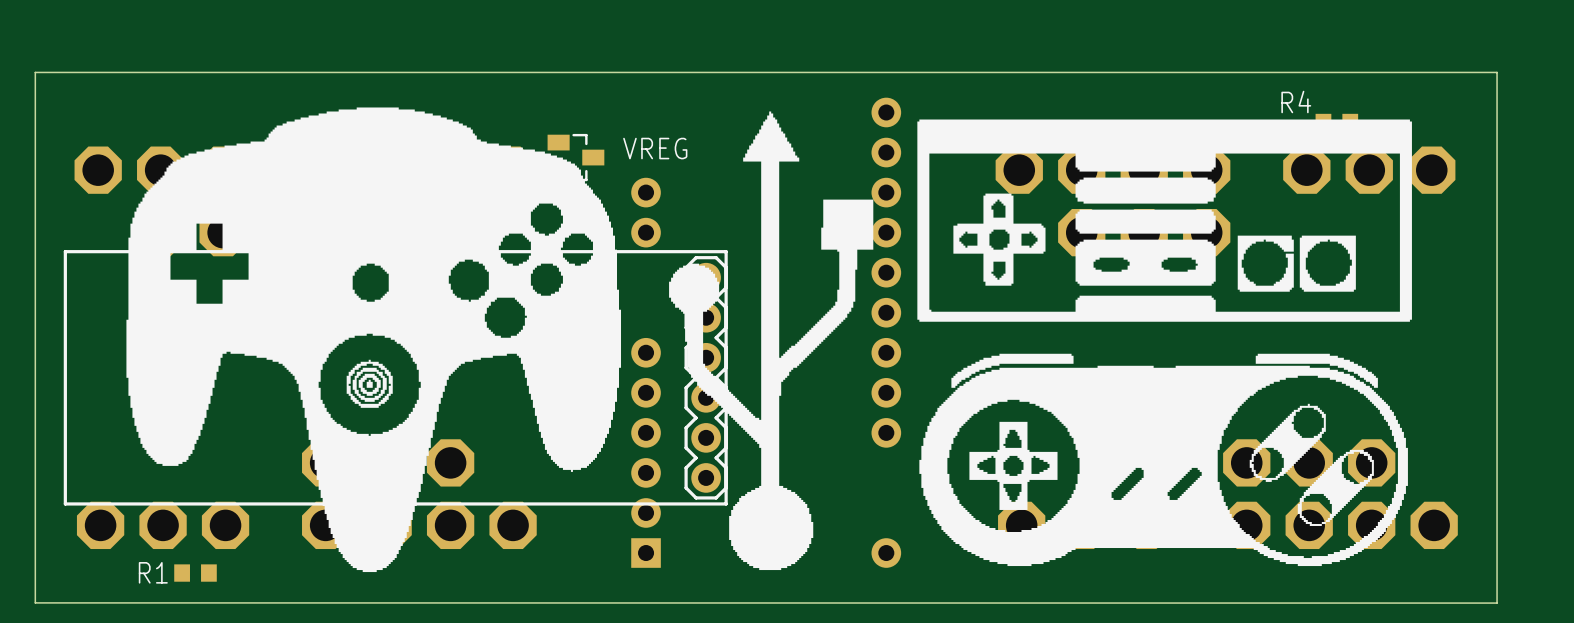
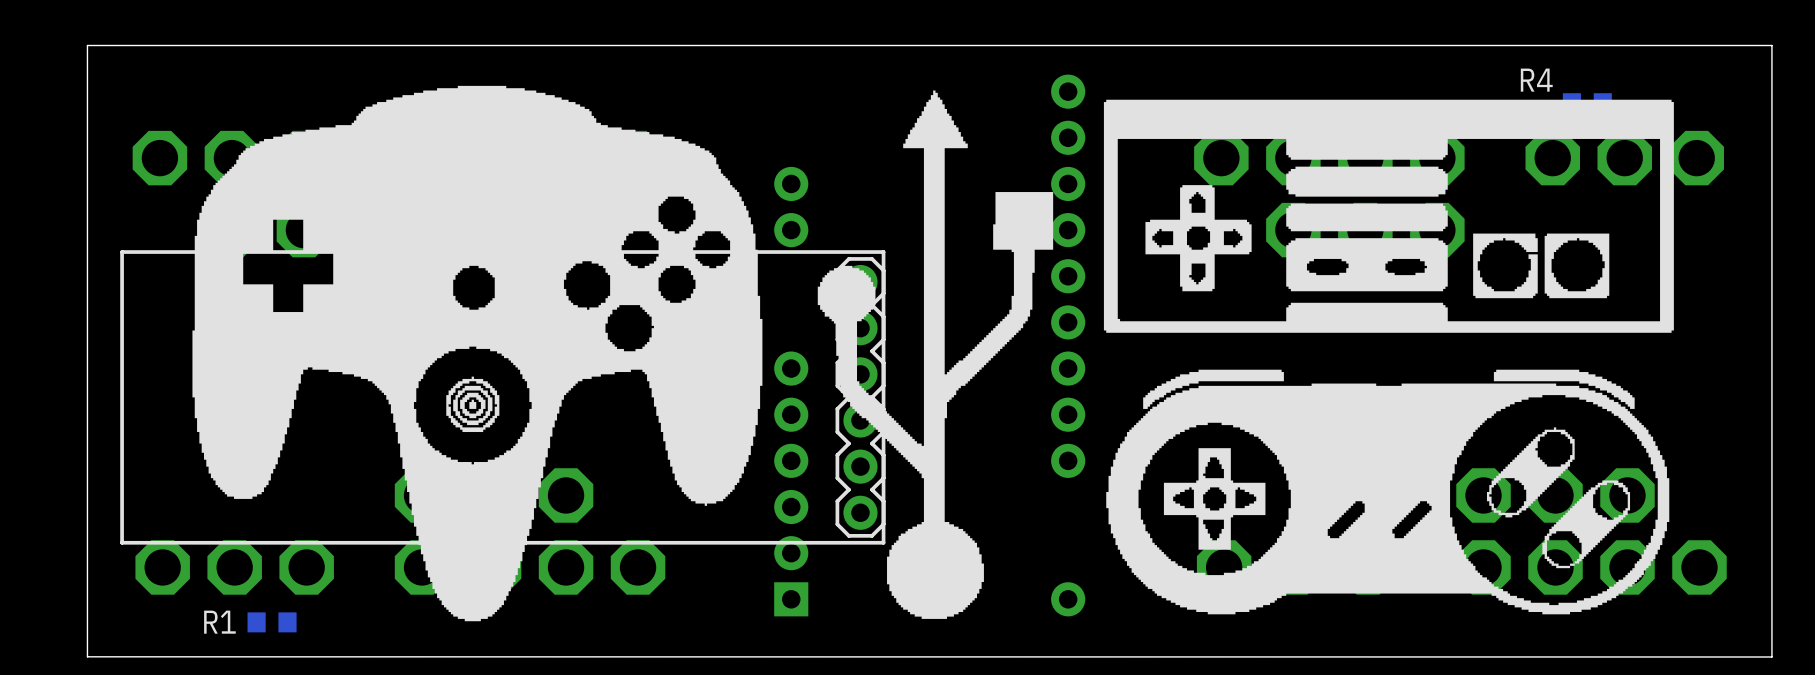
VREG: (575, 157) -> none

